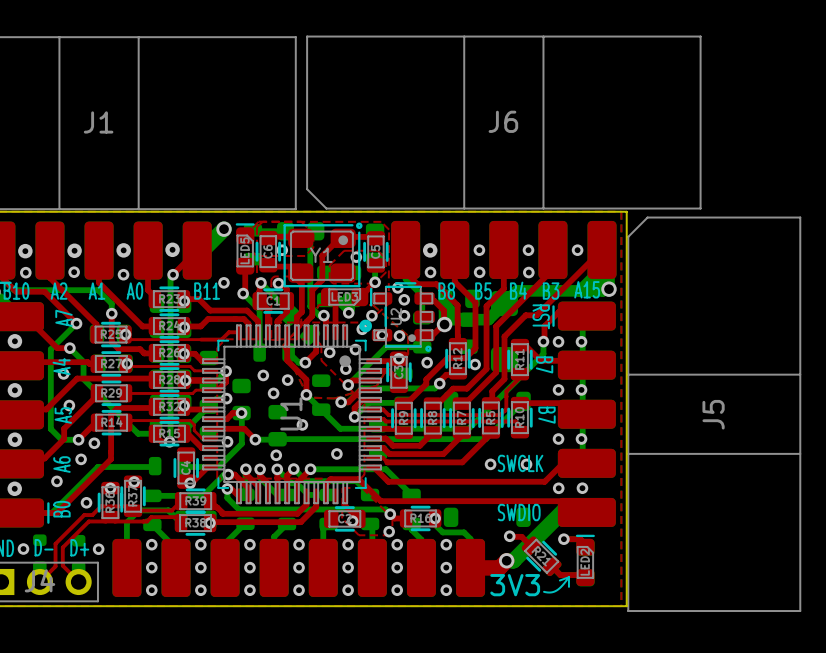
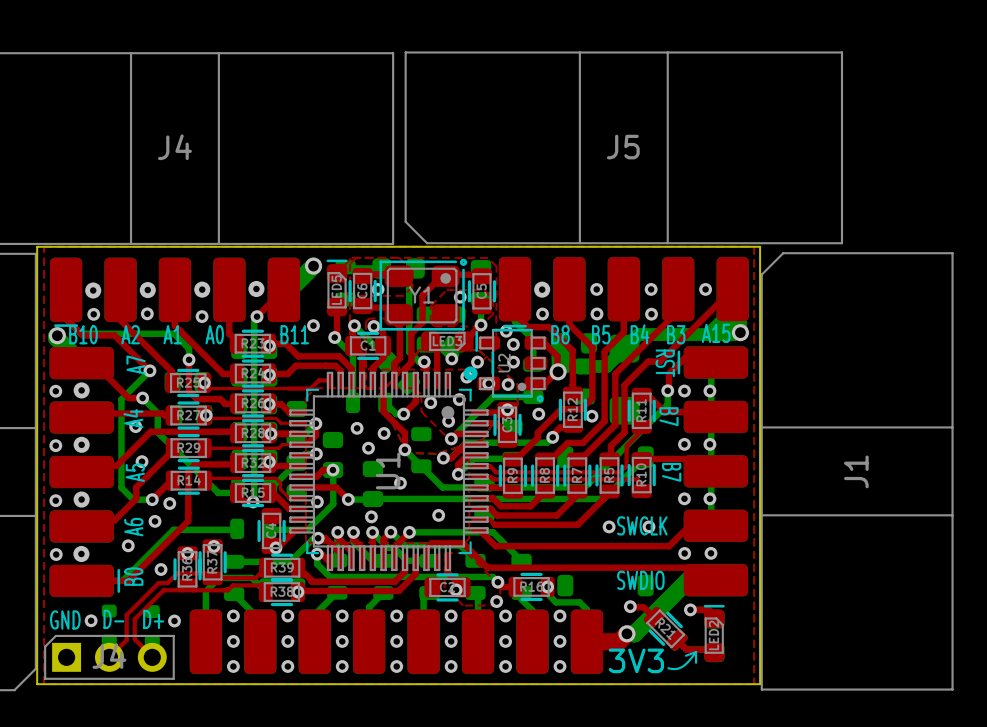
J6 name: J6 (503, 121) -> J5 (623, 147)
J1 name: J1 (98, 122) -> J4 (174, 147)
J5 name: J5 (713, 414) -> J1 (856, 471)

